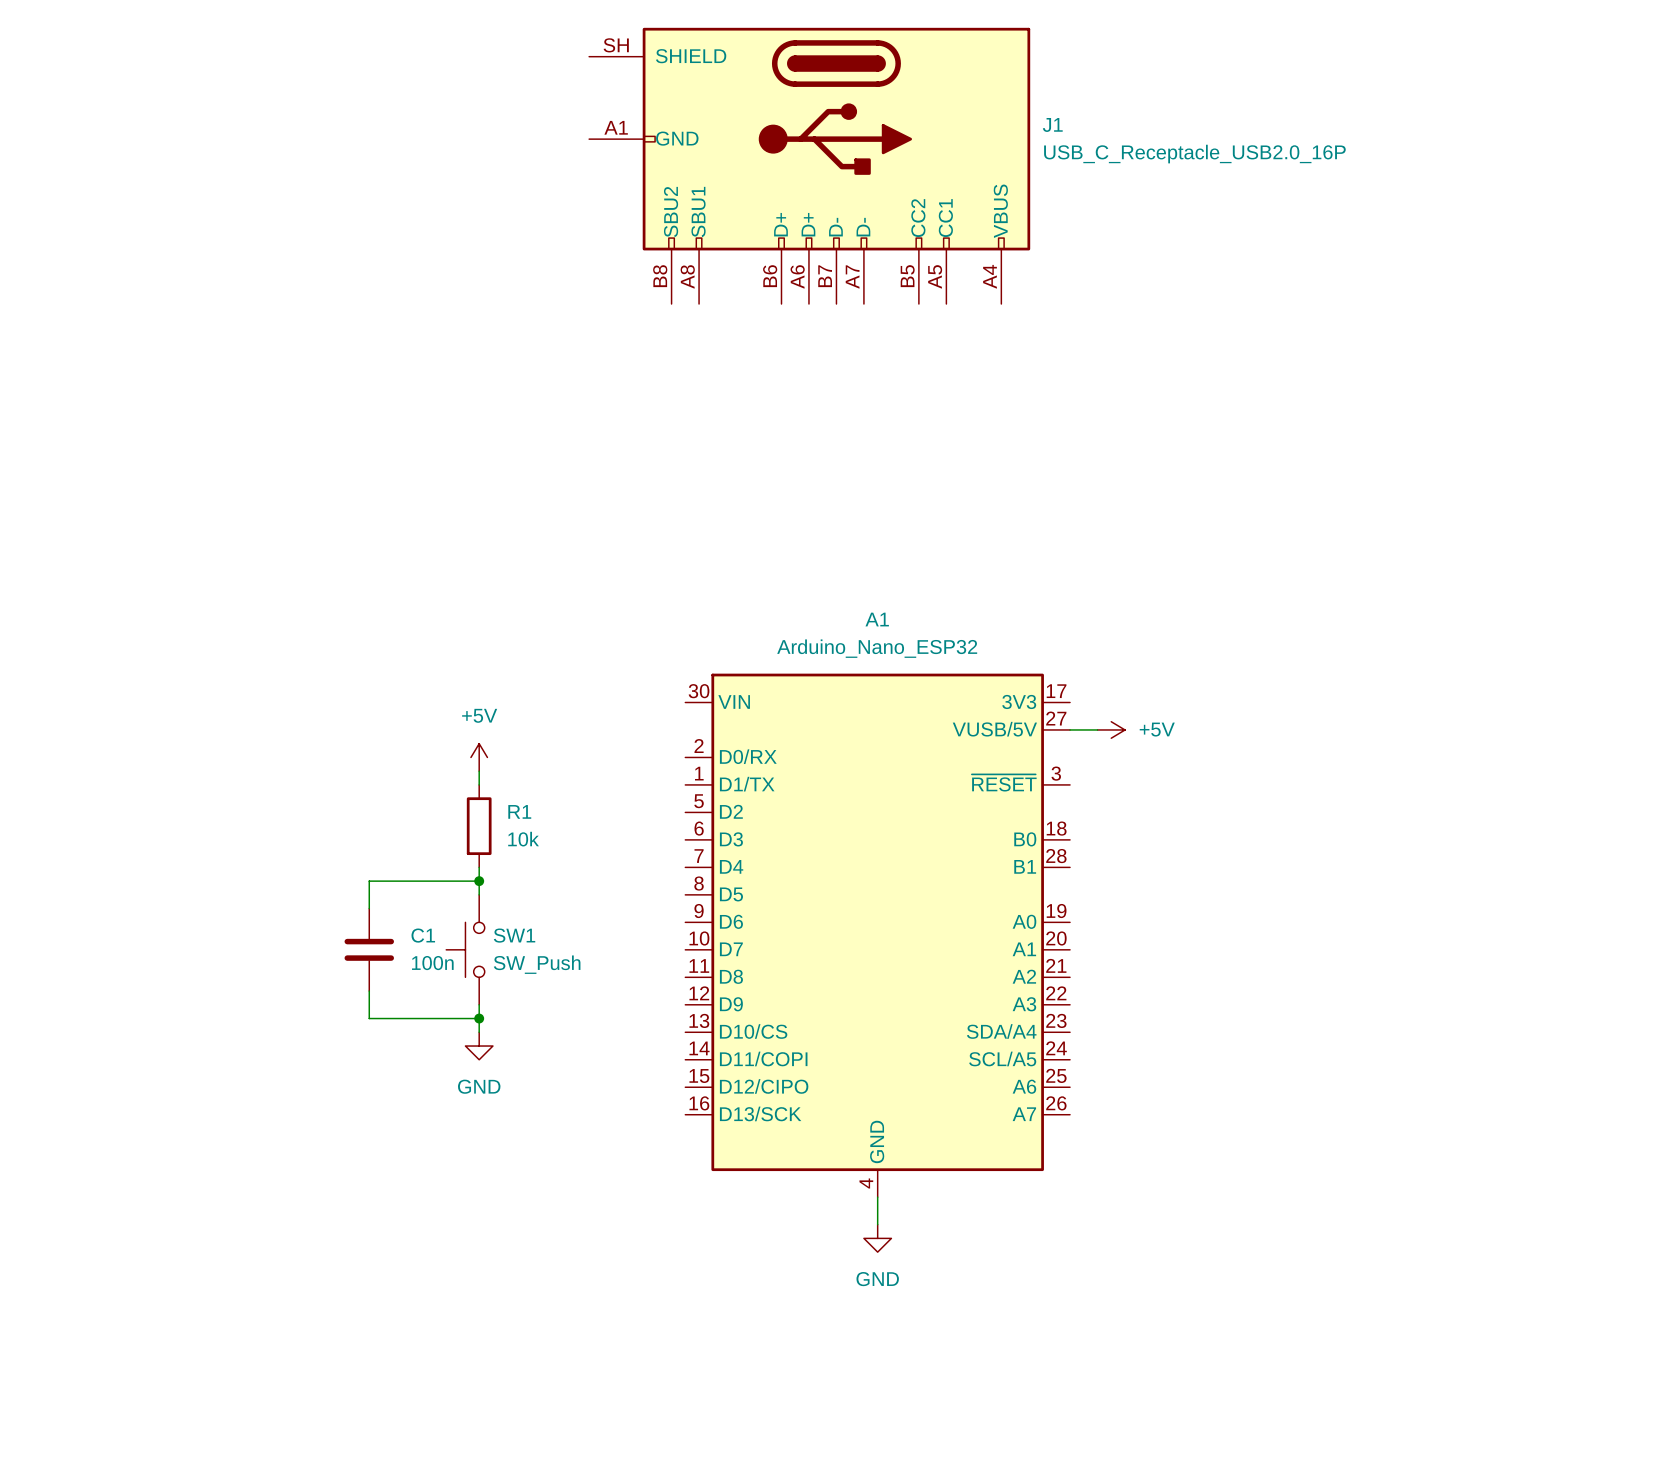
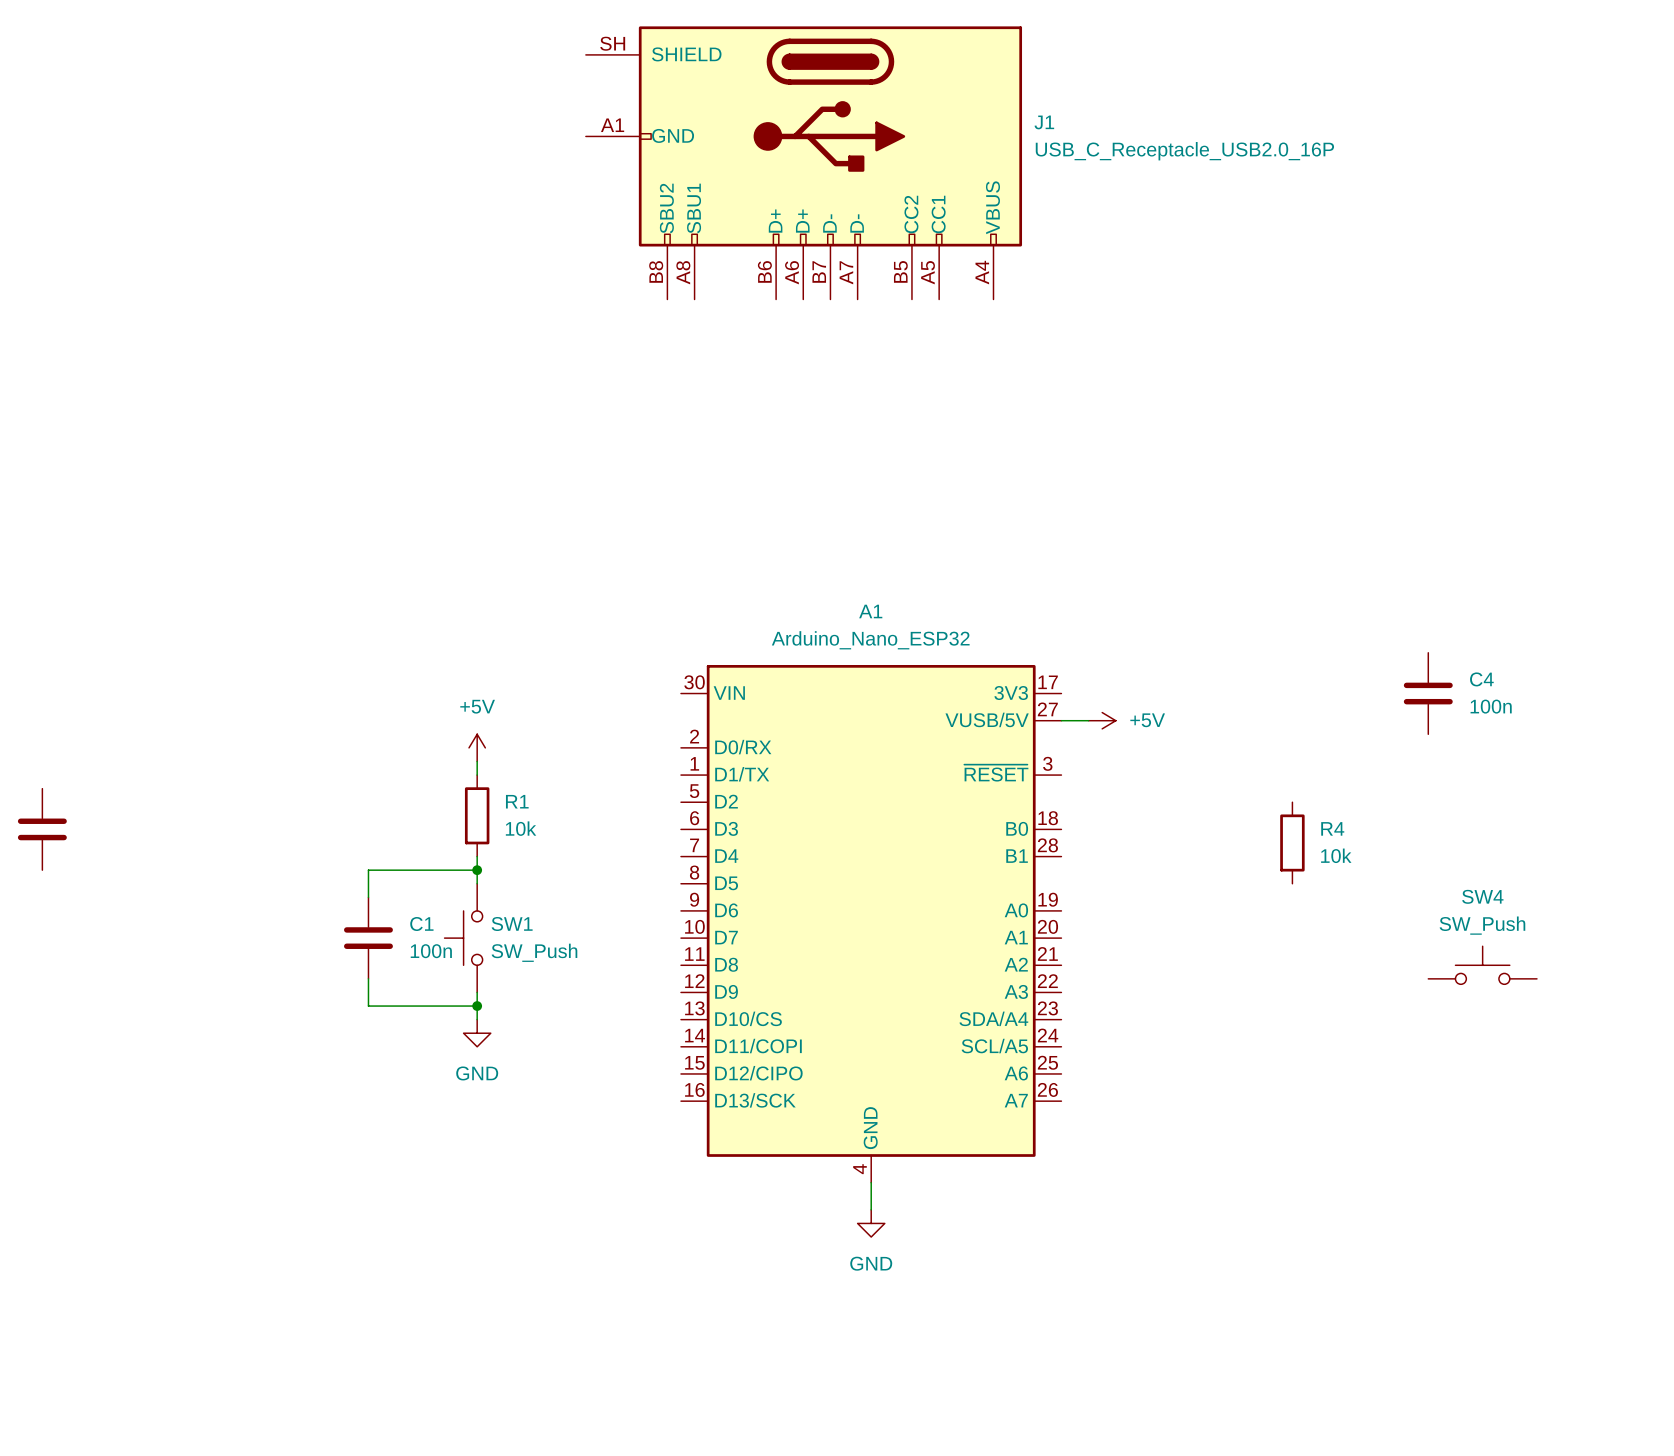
C4: none -> 100n (1428, 693)
part: none -> (42, 829)
R4: none -> 10k (1292, 842)
SW4: none -> SW_Push (1482, 965)

